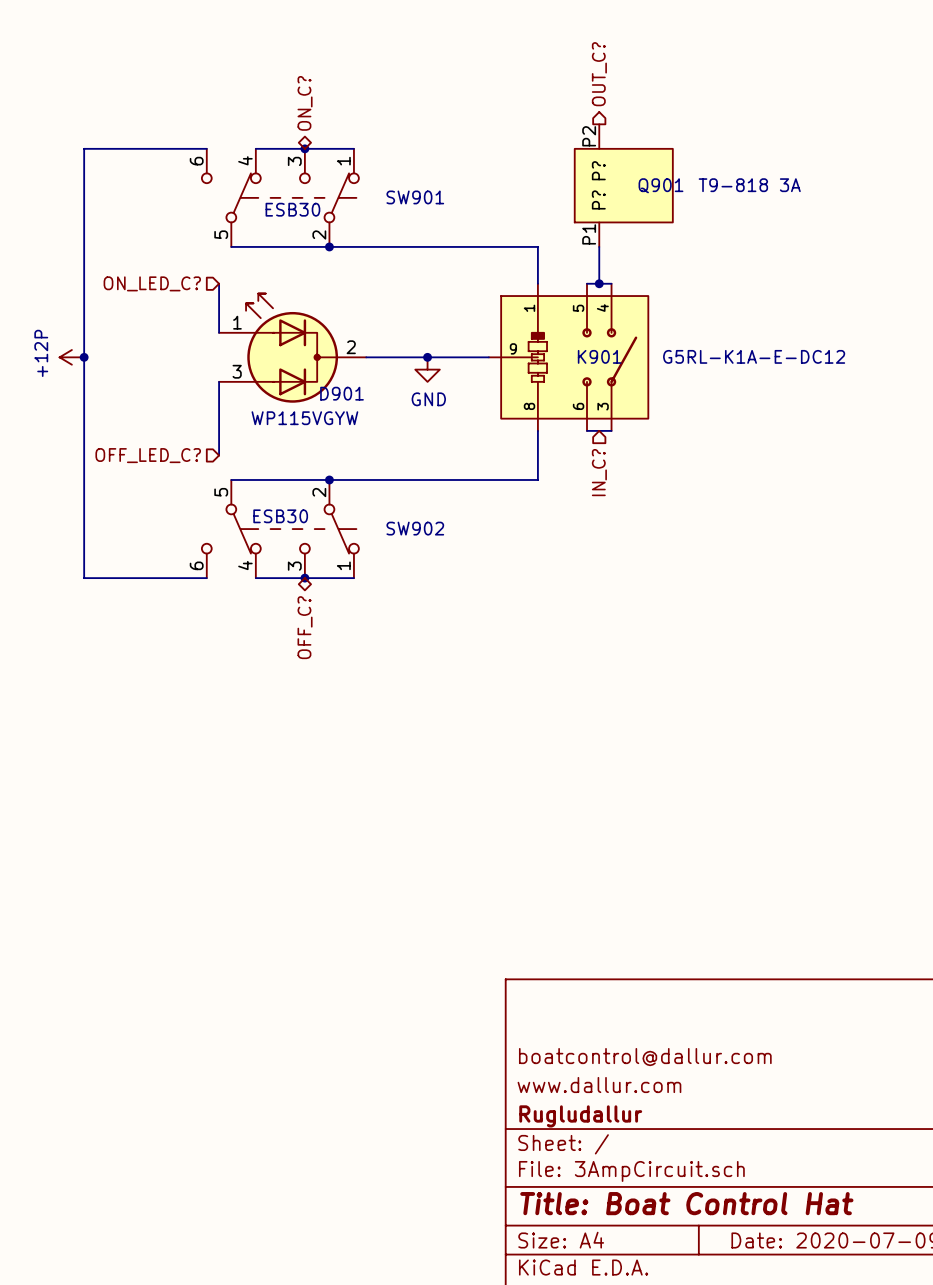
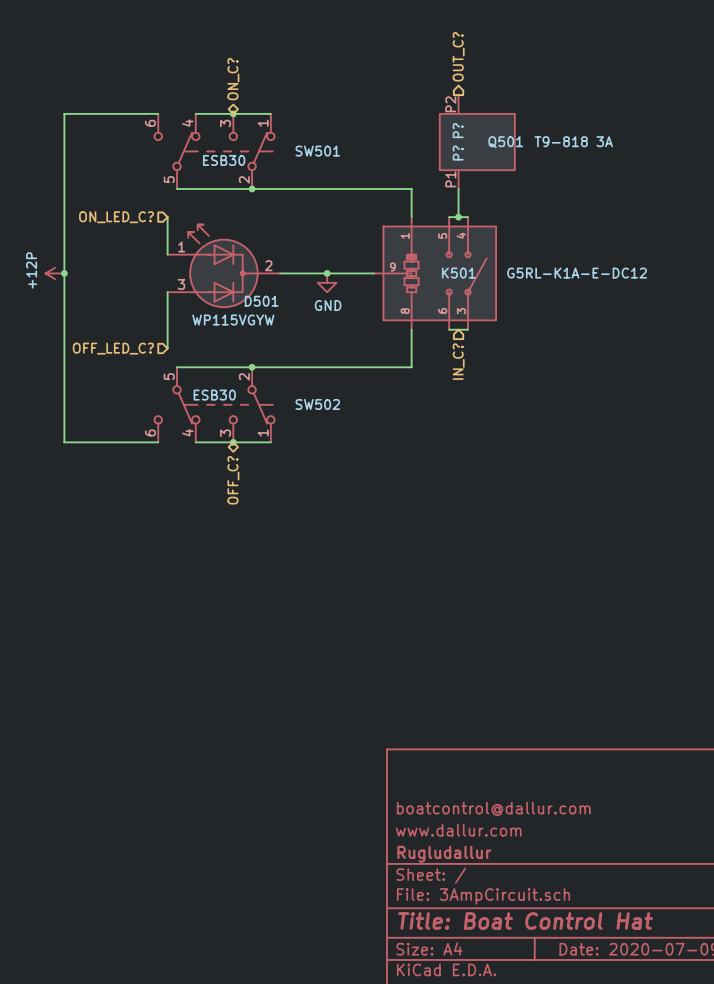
Q901 name: Q901 (660, 185) -> Q501 (505, 142)
SW901 name: SW901 (415, 197) -> SW501 (317, 151)
K901 name: K901 (599, 356) -> K501 (458, 273)
D901 name: D901 (342, 393) -> D501 (261, 301)
SW902 name: SW902 (415, 528) -> SW502 (317, 404)

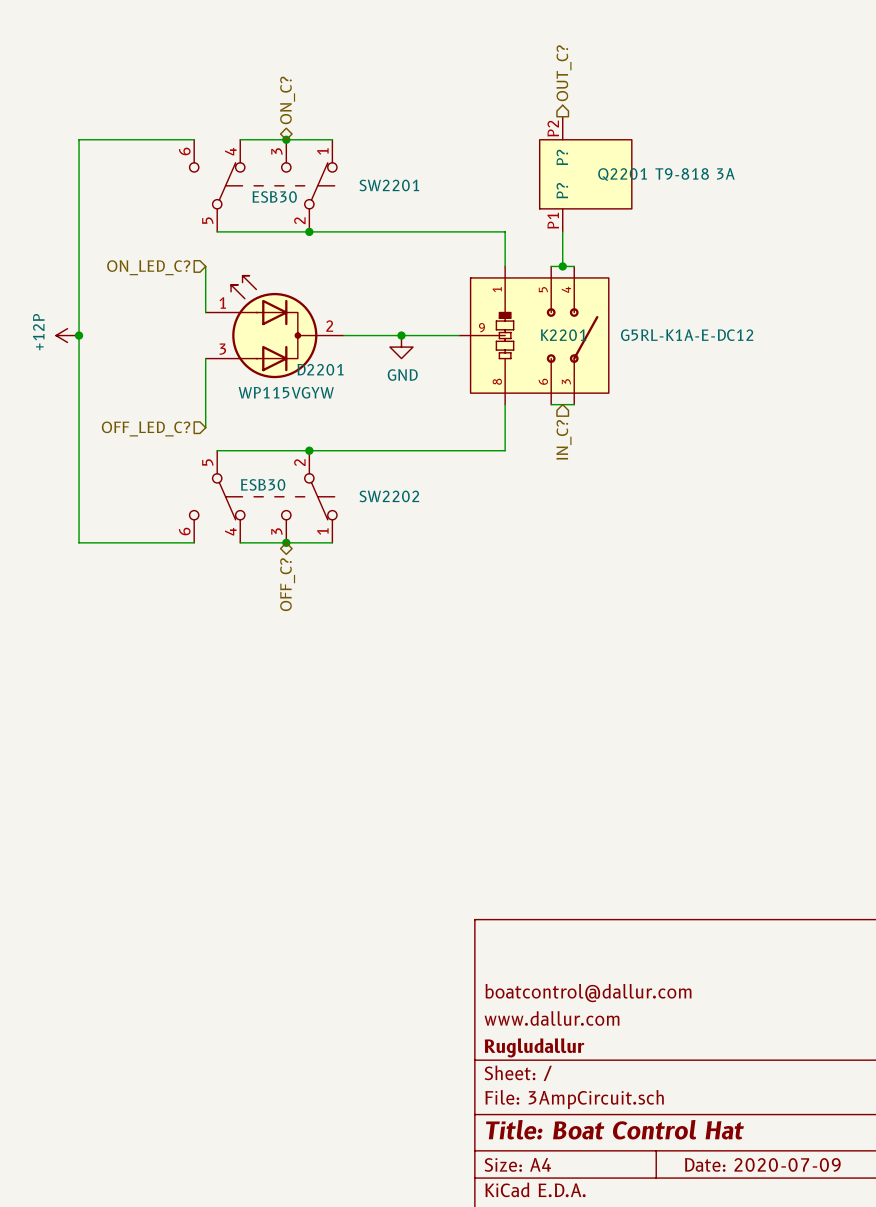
Q501 name: Q501 (505, 142) -> Q2201 (622, 174)
SW501 name: SW501 (317, 151) -> SW2201 (389, 185)
K501 name: K501 (458, 273) -> K2201 (563, 335)
D501 name: D501 (261, 301) -> D2201 (320, 369)
SW502 name: SW502 (317, 404) -> SW2202 (389, 496)

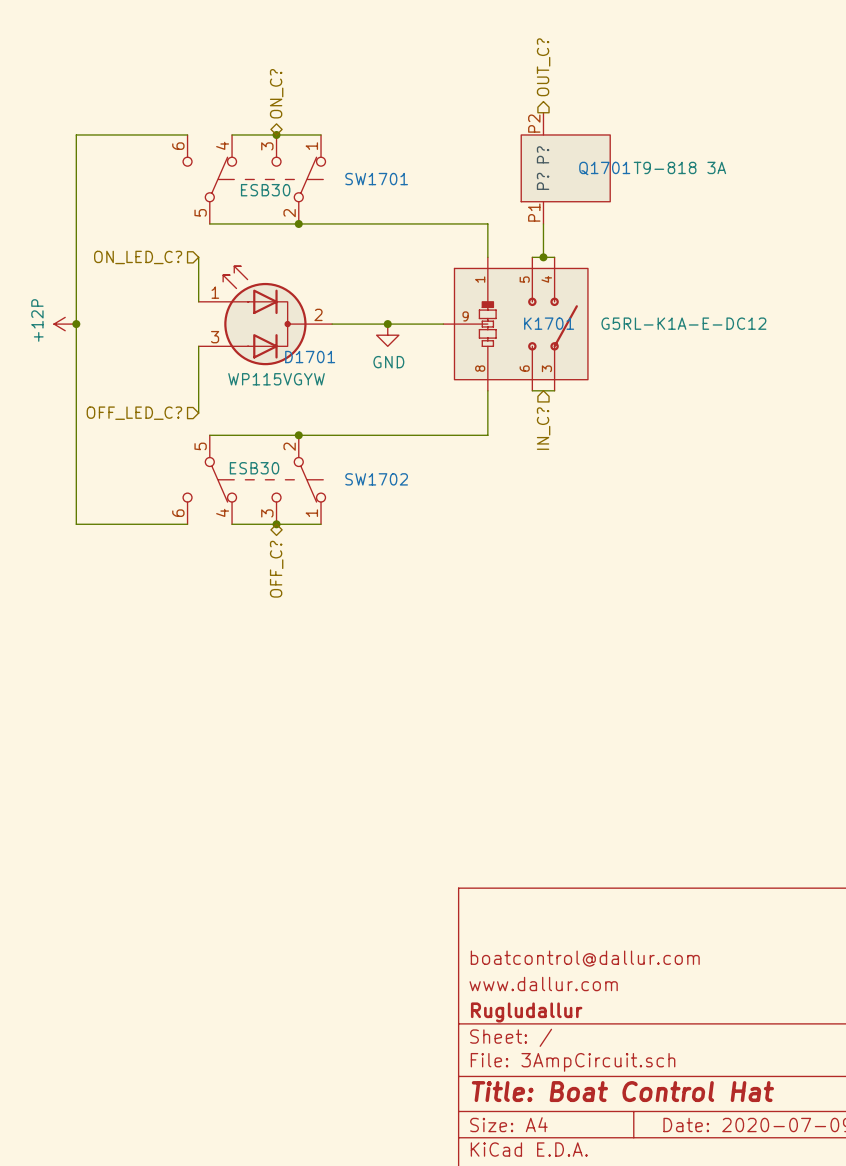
Q2201 name: Q2201 (622, 174) -> Q1701 (604, 168)
SW2201 name: SW2201 (389, 185) -> SW1701 (376, 179)
K2201 name: K2201 (563, 335) -> K1701 (549, 323)
D2201 name: D2201 (320, 369) -> D1701 (310, 357)
SW2202 name: SW2202 (389, 496) -> SW1702 (376, 479)

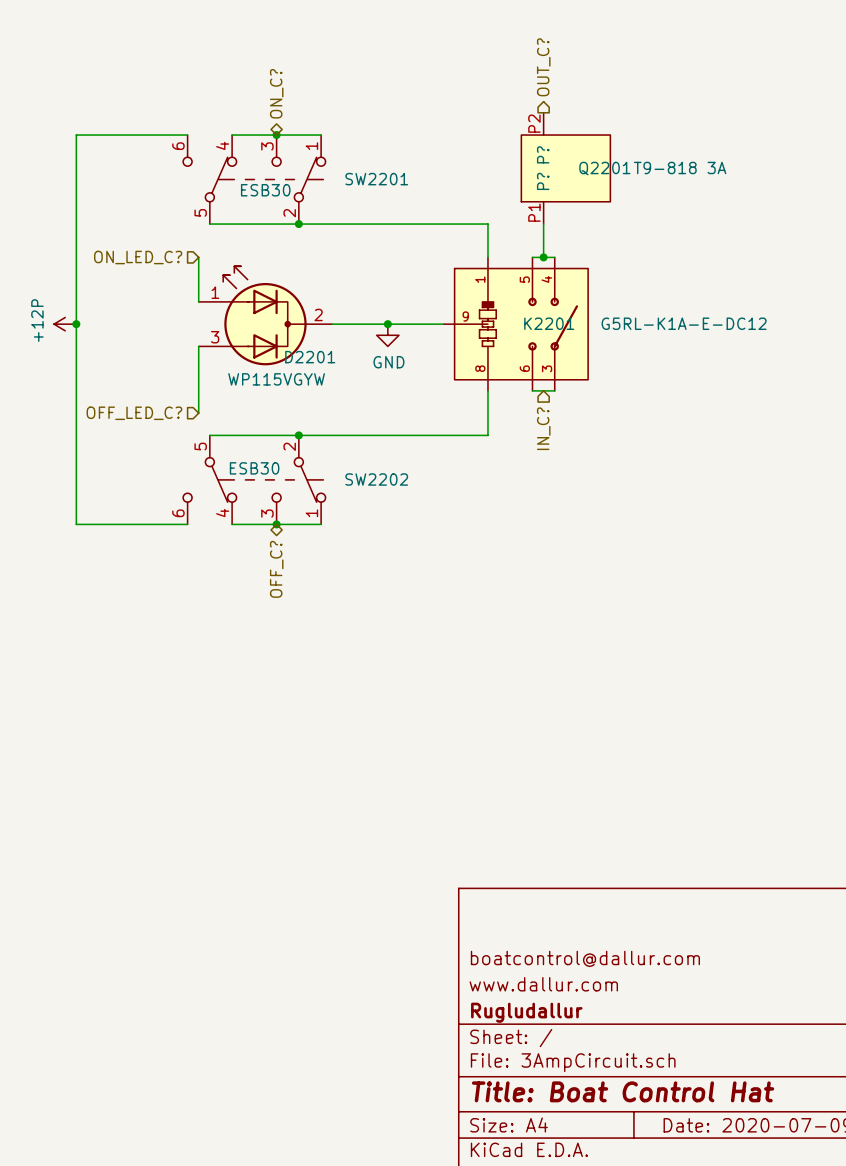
Q1701 name: Q1701 (604, 168) -> Q2201 (604, 168)
SW1701 name: SW1701 (376, 179) -> SW2201 (376, 179)
K1701 name: K1701 (549, 323) -> K2201 (549, 323)
D1701 name: D1701 (310, 357) -> D2201 (310, 357)
SW1702 name: SW1702 (376, 479) -> SW2202 (376, 479)

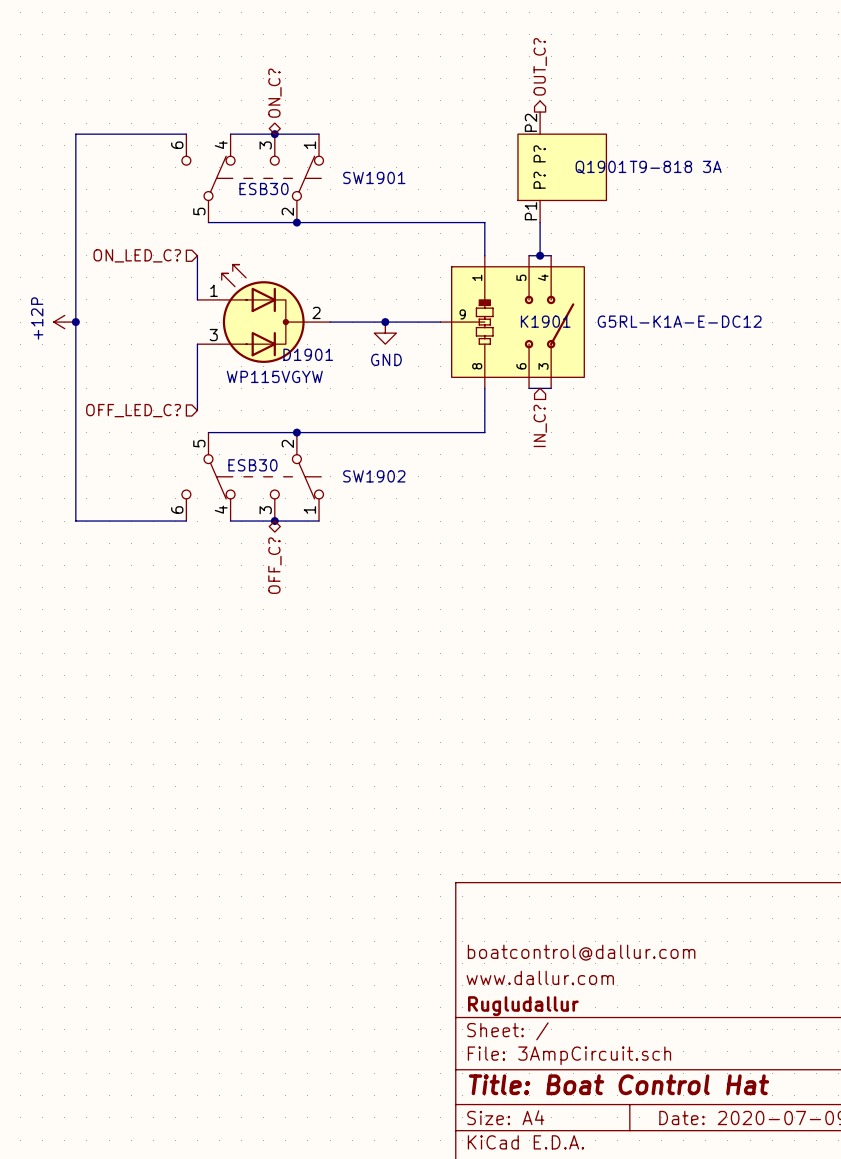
Q2201 name: Q2201 (604, 168) -> Q1901 (600, 167)
SW2201 name: SW2201 (376, 179) -> SW1901 (374, 177)
K2201 name: K2201 (549, 323) -> K1901 (545, 321)
D2201 name: D2201 (310, 357) -> D1901 (308, 354)
SW2202 name: SW2202 (376, 479) -> SW1902 (374, 476)

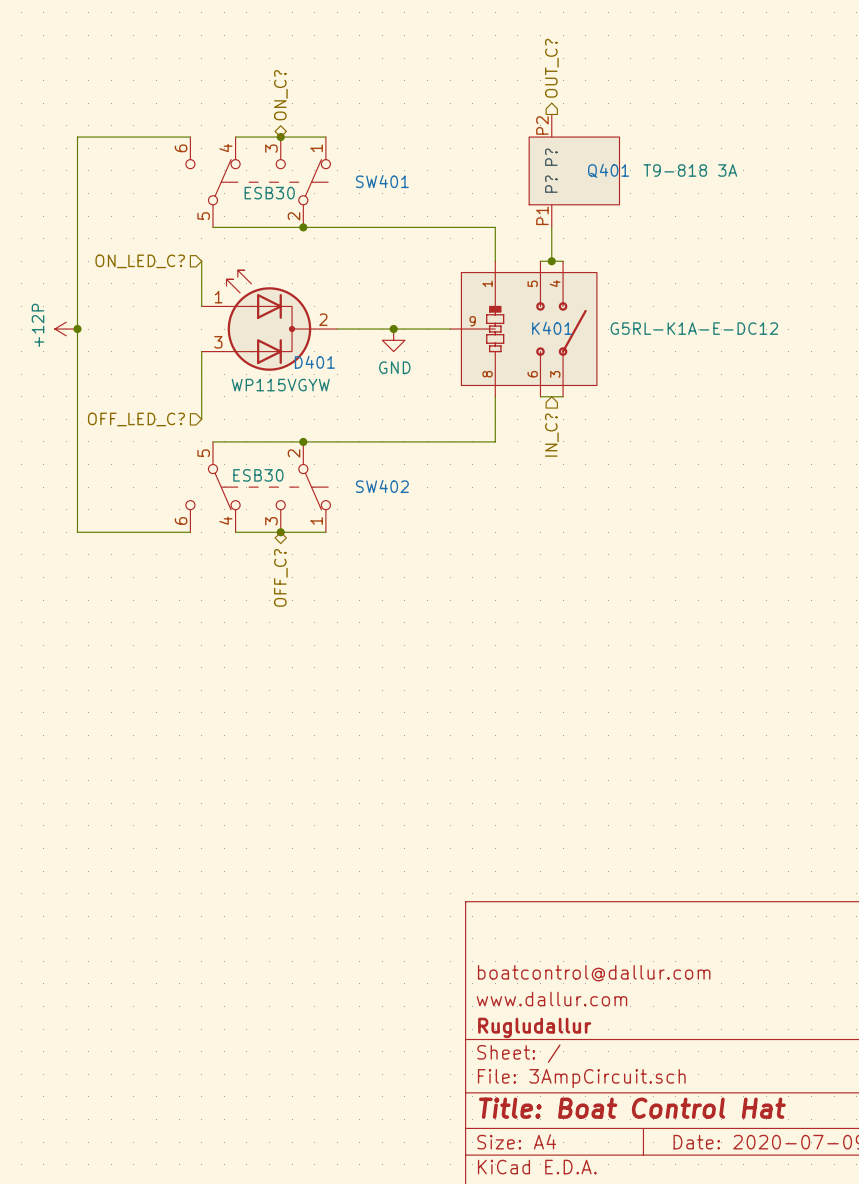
Q1901 name: Q1901 (600, 167) -> Q401 (608, 170)
SW1901 name: SW1901 (374, 177) -> SW401 (382, 181)
K1901 name: K1901 (545, 321) -> K401 (552, 328)
D1901 name: D1901 (308, 354) -> D401 (314, 362)
SW1902 name: SW1902 (374, 476) -> SW402 (382, 486)

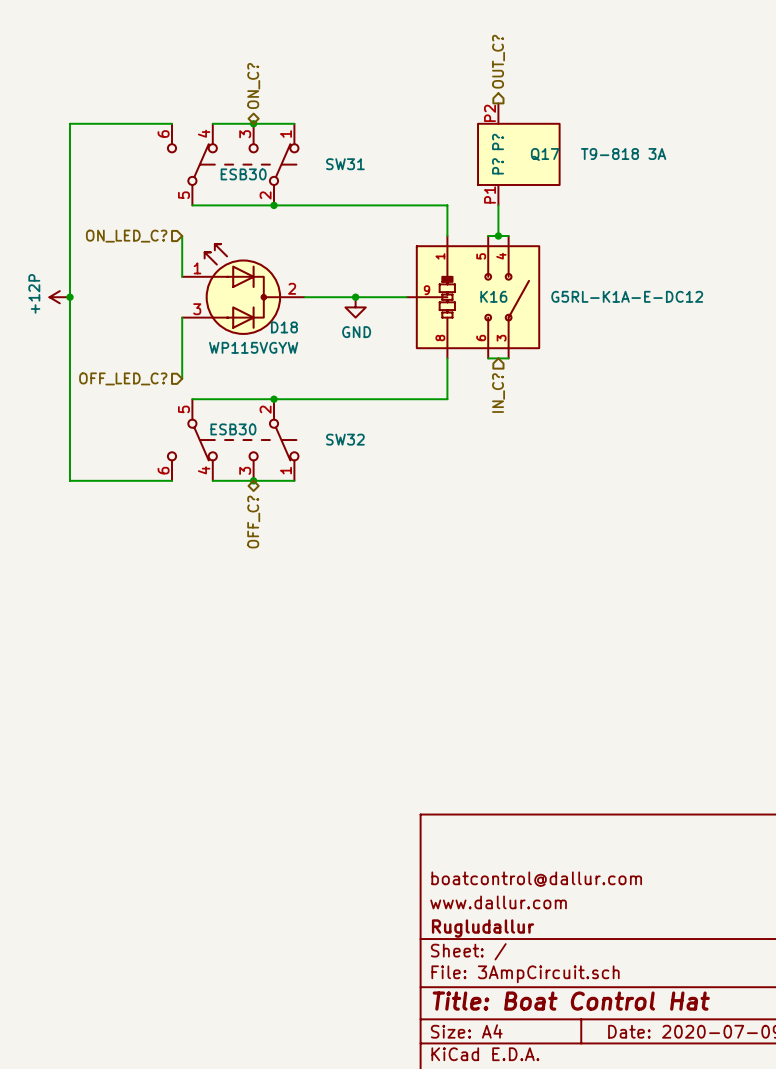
Q401 name: Q401 (608, 170) -> Q17 (545, 154)
SW401 name: SW401 (382, 181) -> SW31 (345, 164)
K401 name: K401 (552, 328) -> K16 (493, 296)
D401 name: D401 (314, 362) -> D18 (284, 327)
SW402 name: SW402 (382, 486) -> SW32 (345, 439)

